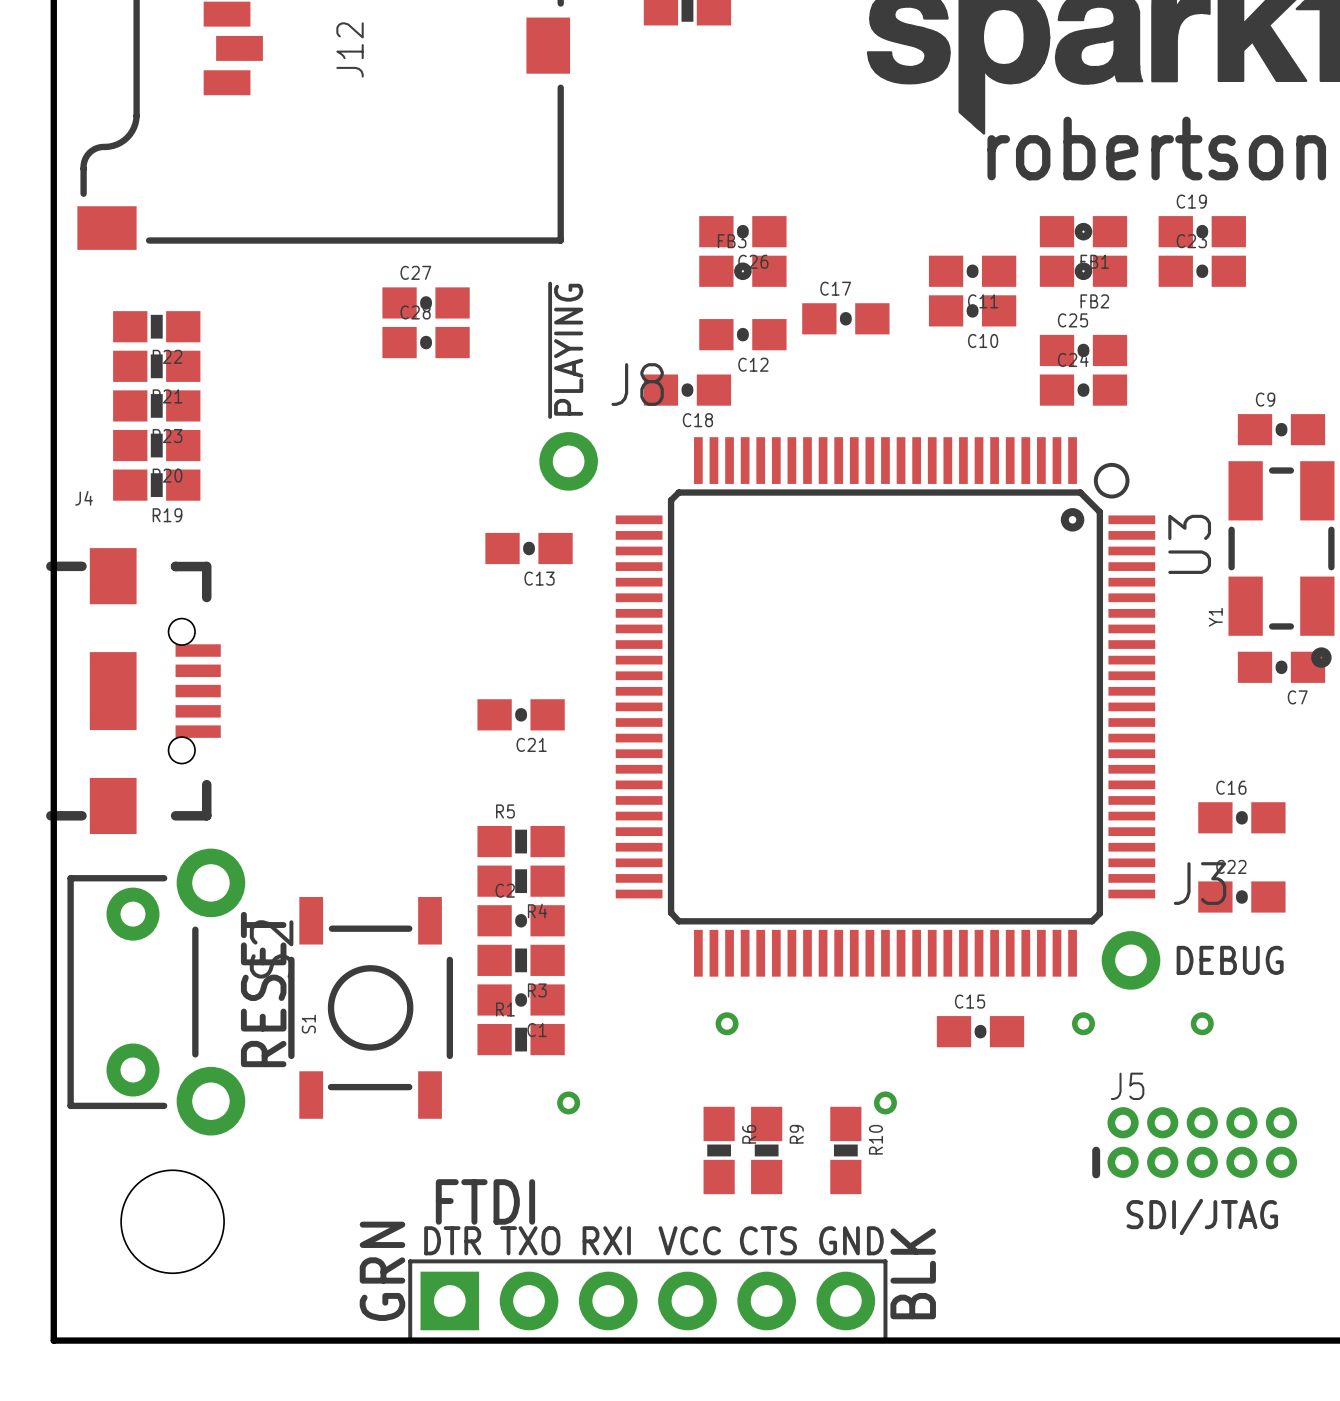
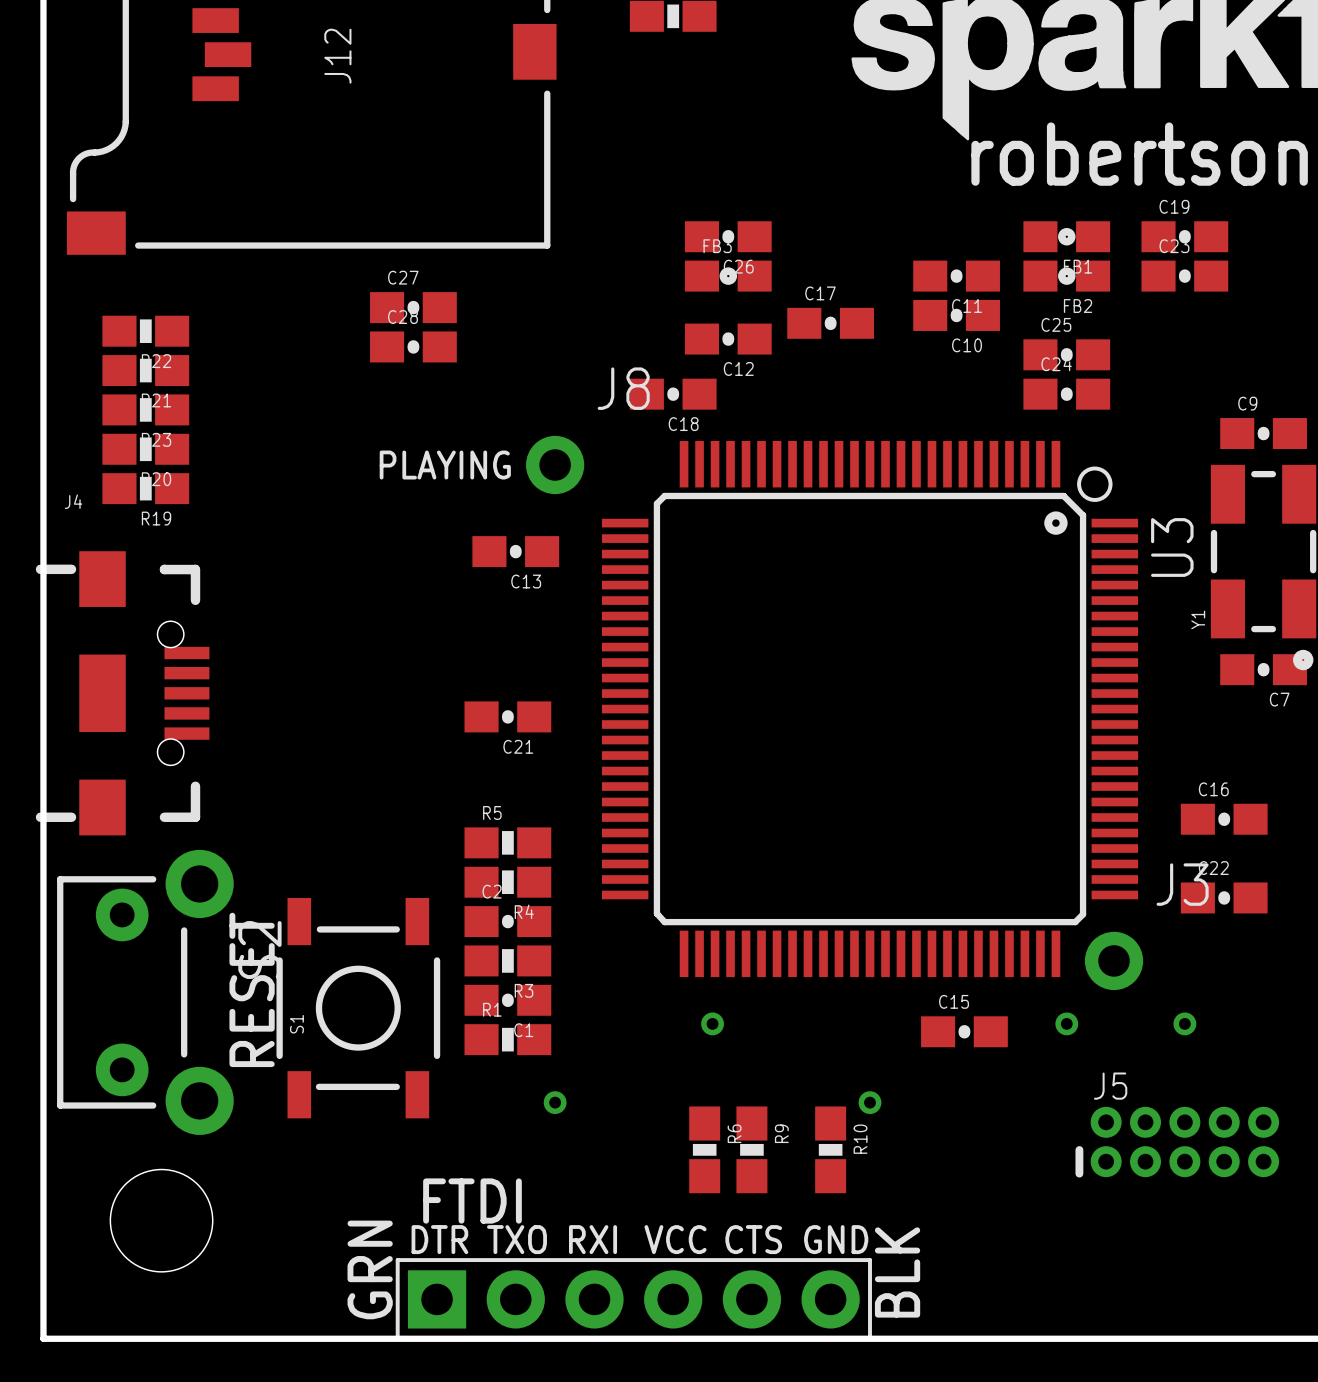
text: ~{PLAYING} (565, 350) -> none
text: none -> PLAYING (445, 465)
text: DEBUG (1230, 960) -> none
text: SDI/JTAG (1202, 1217) -> none

